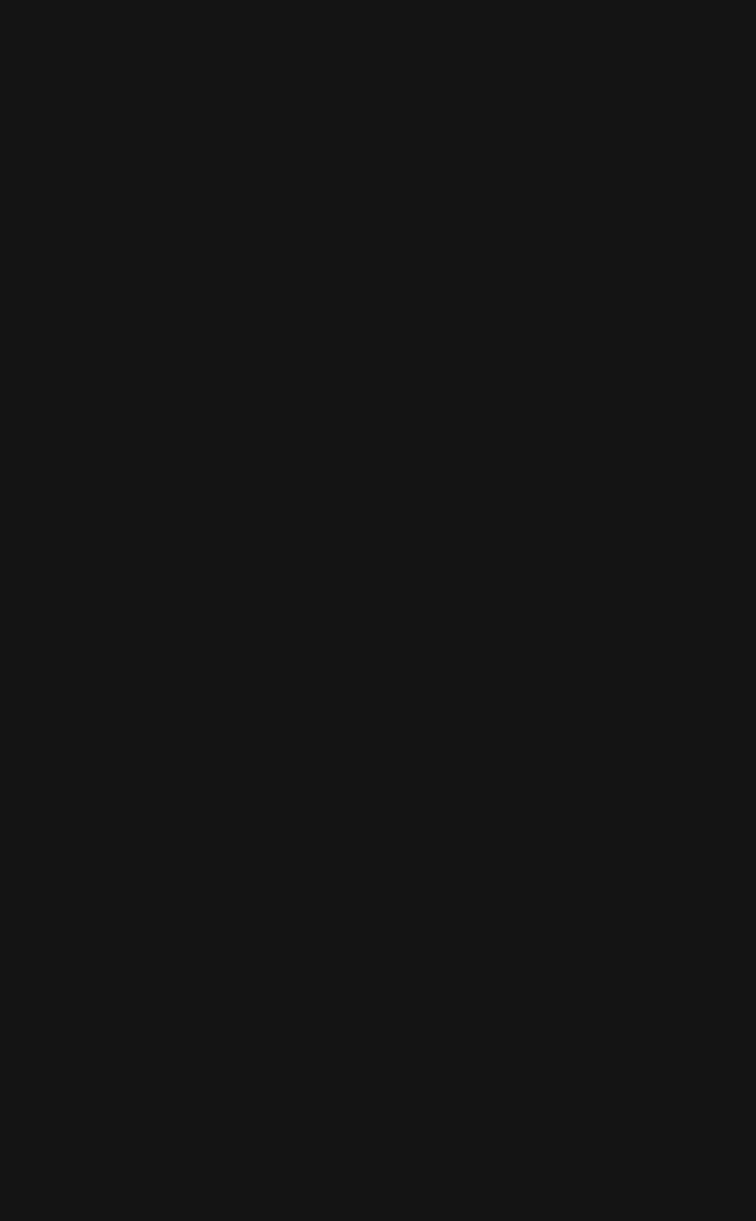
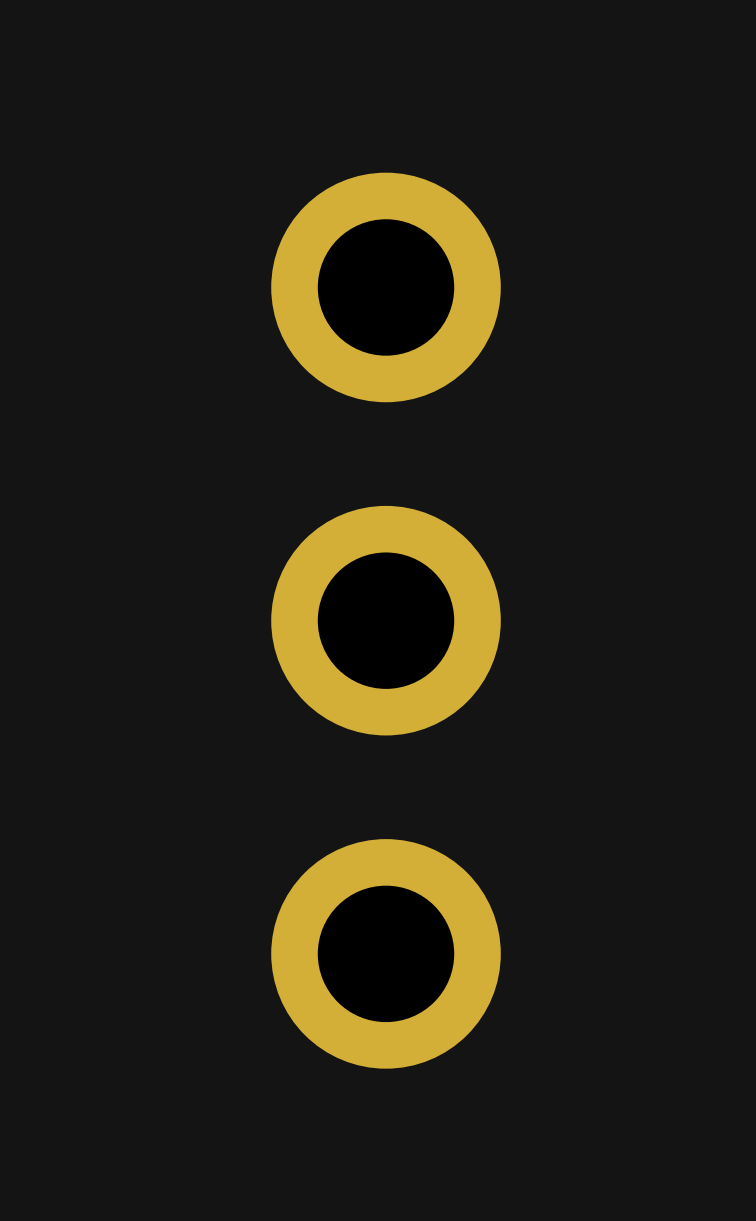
part: none -> (386, 620)

